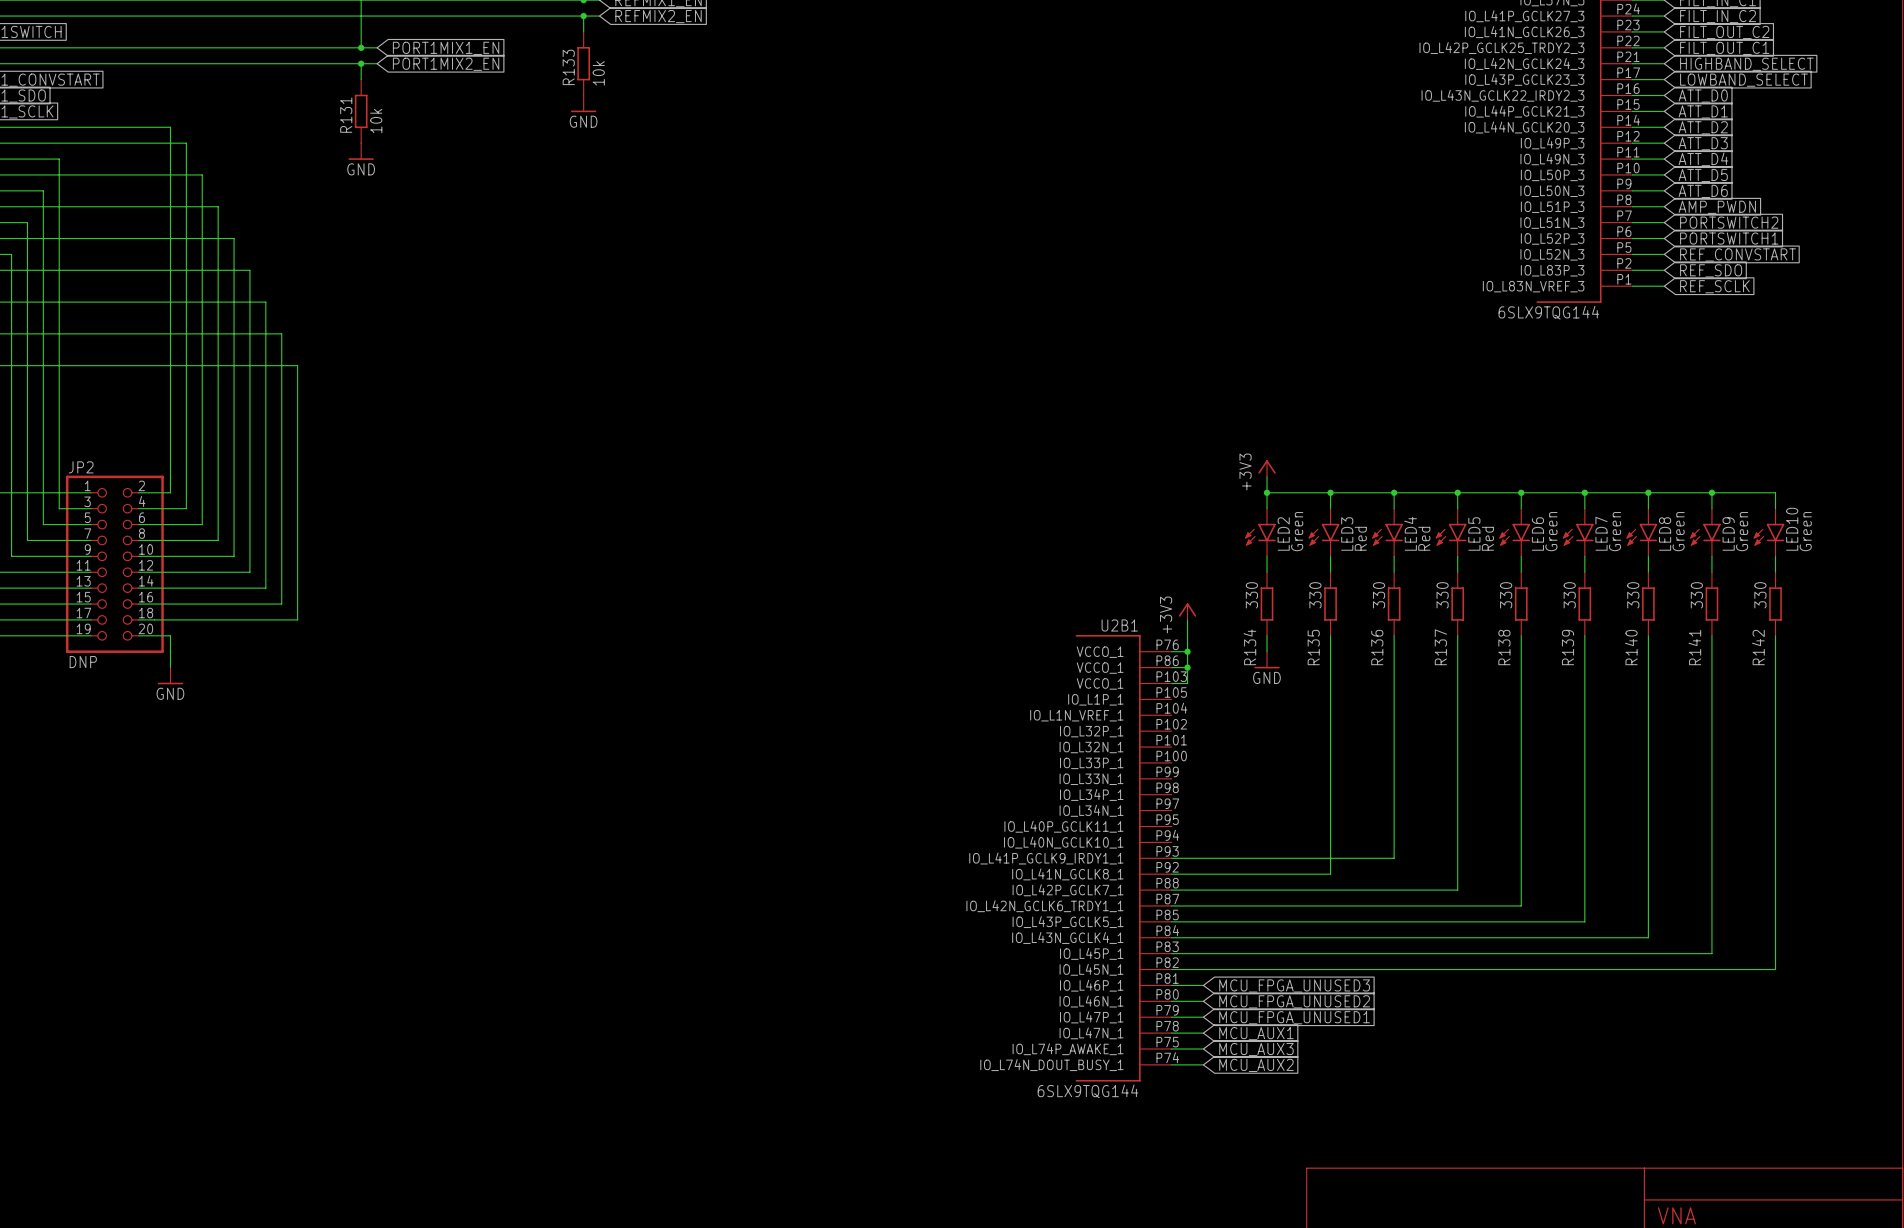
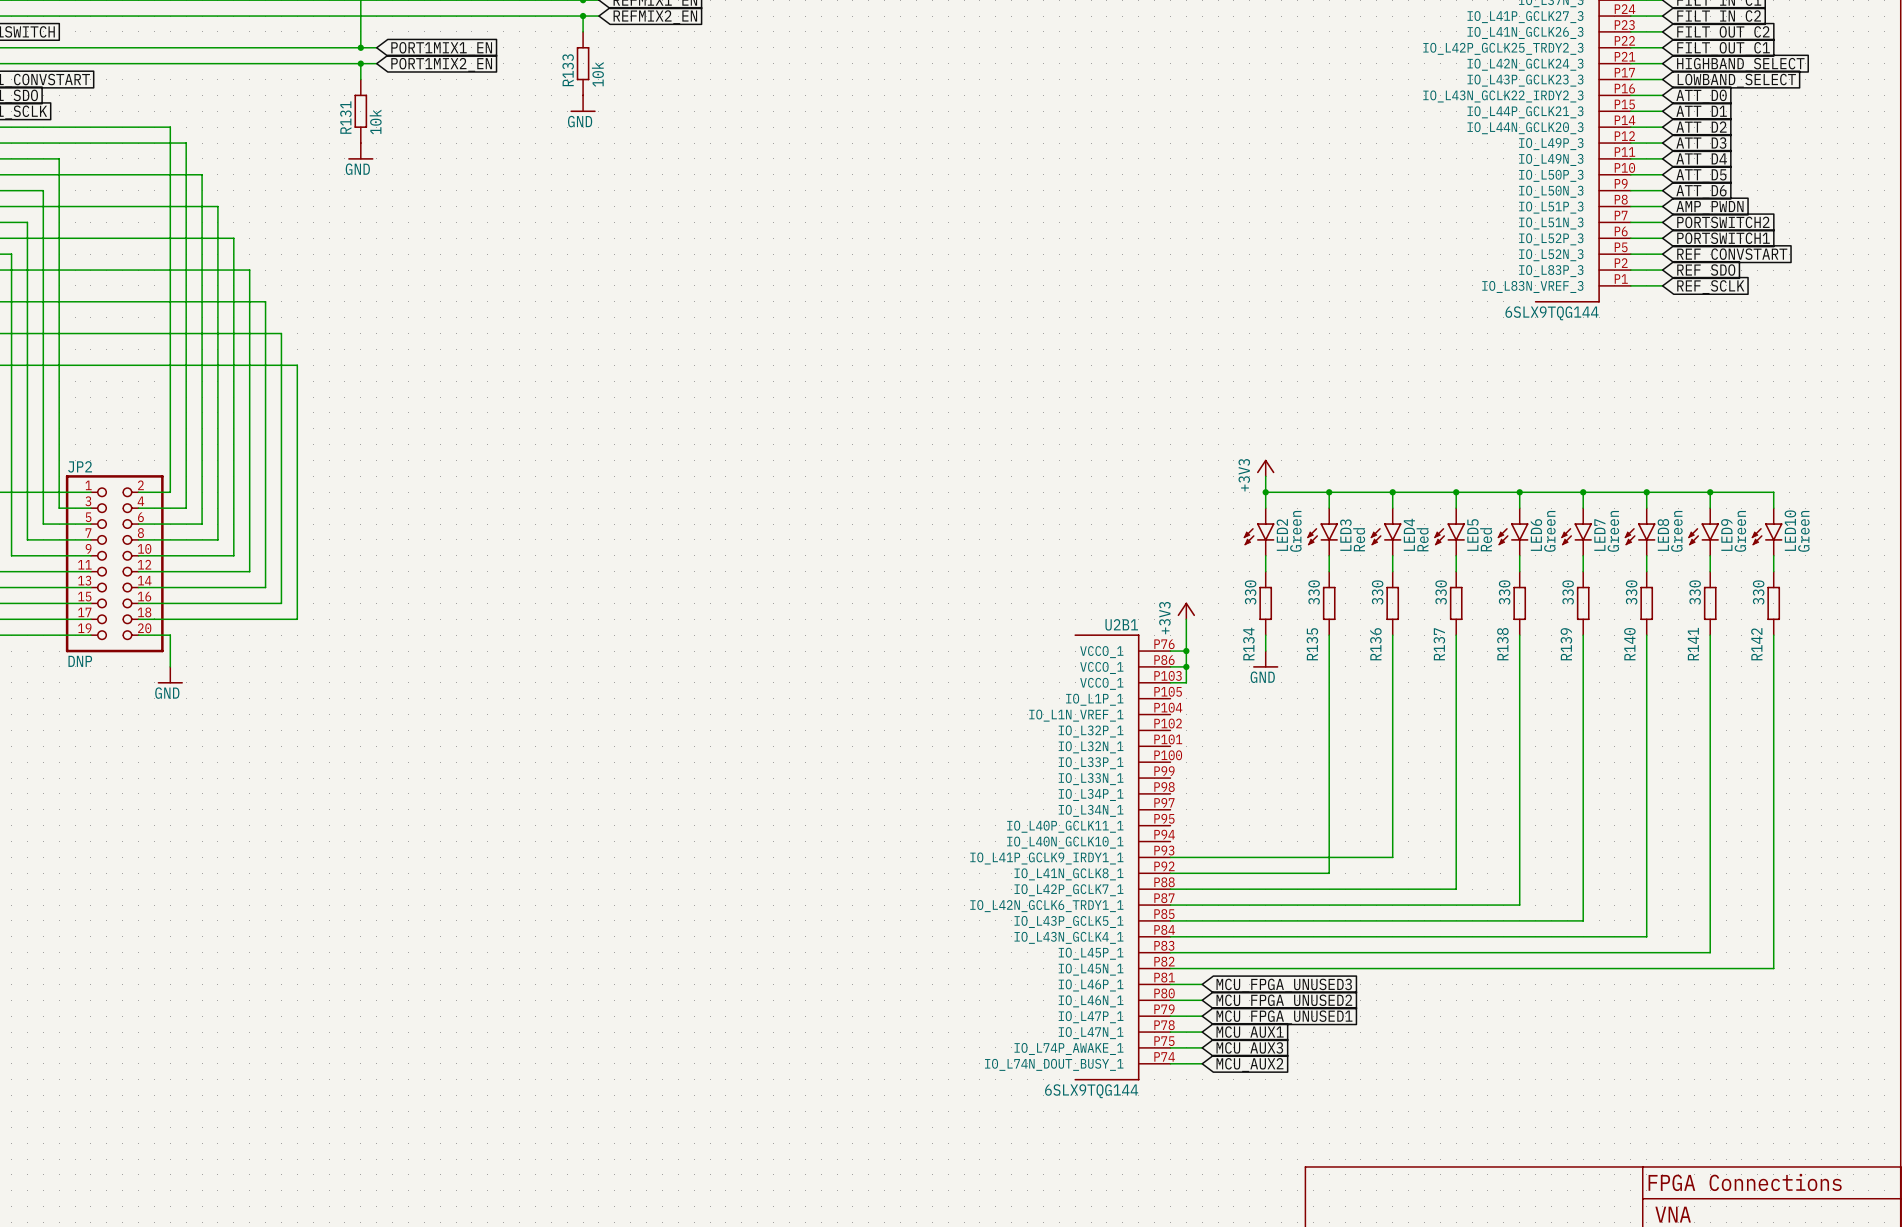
text: none -> FPGA Connections (1745, 1182)

